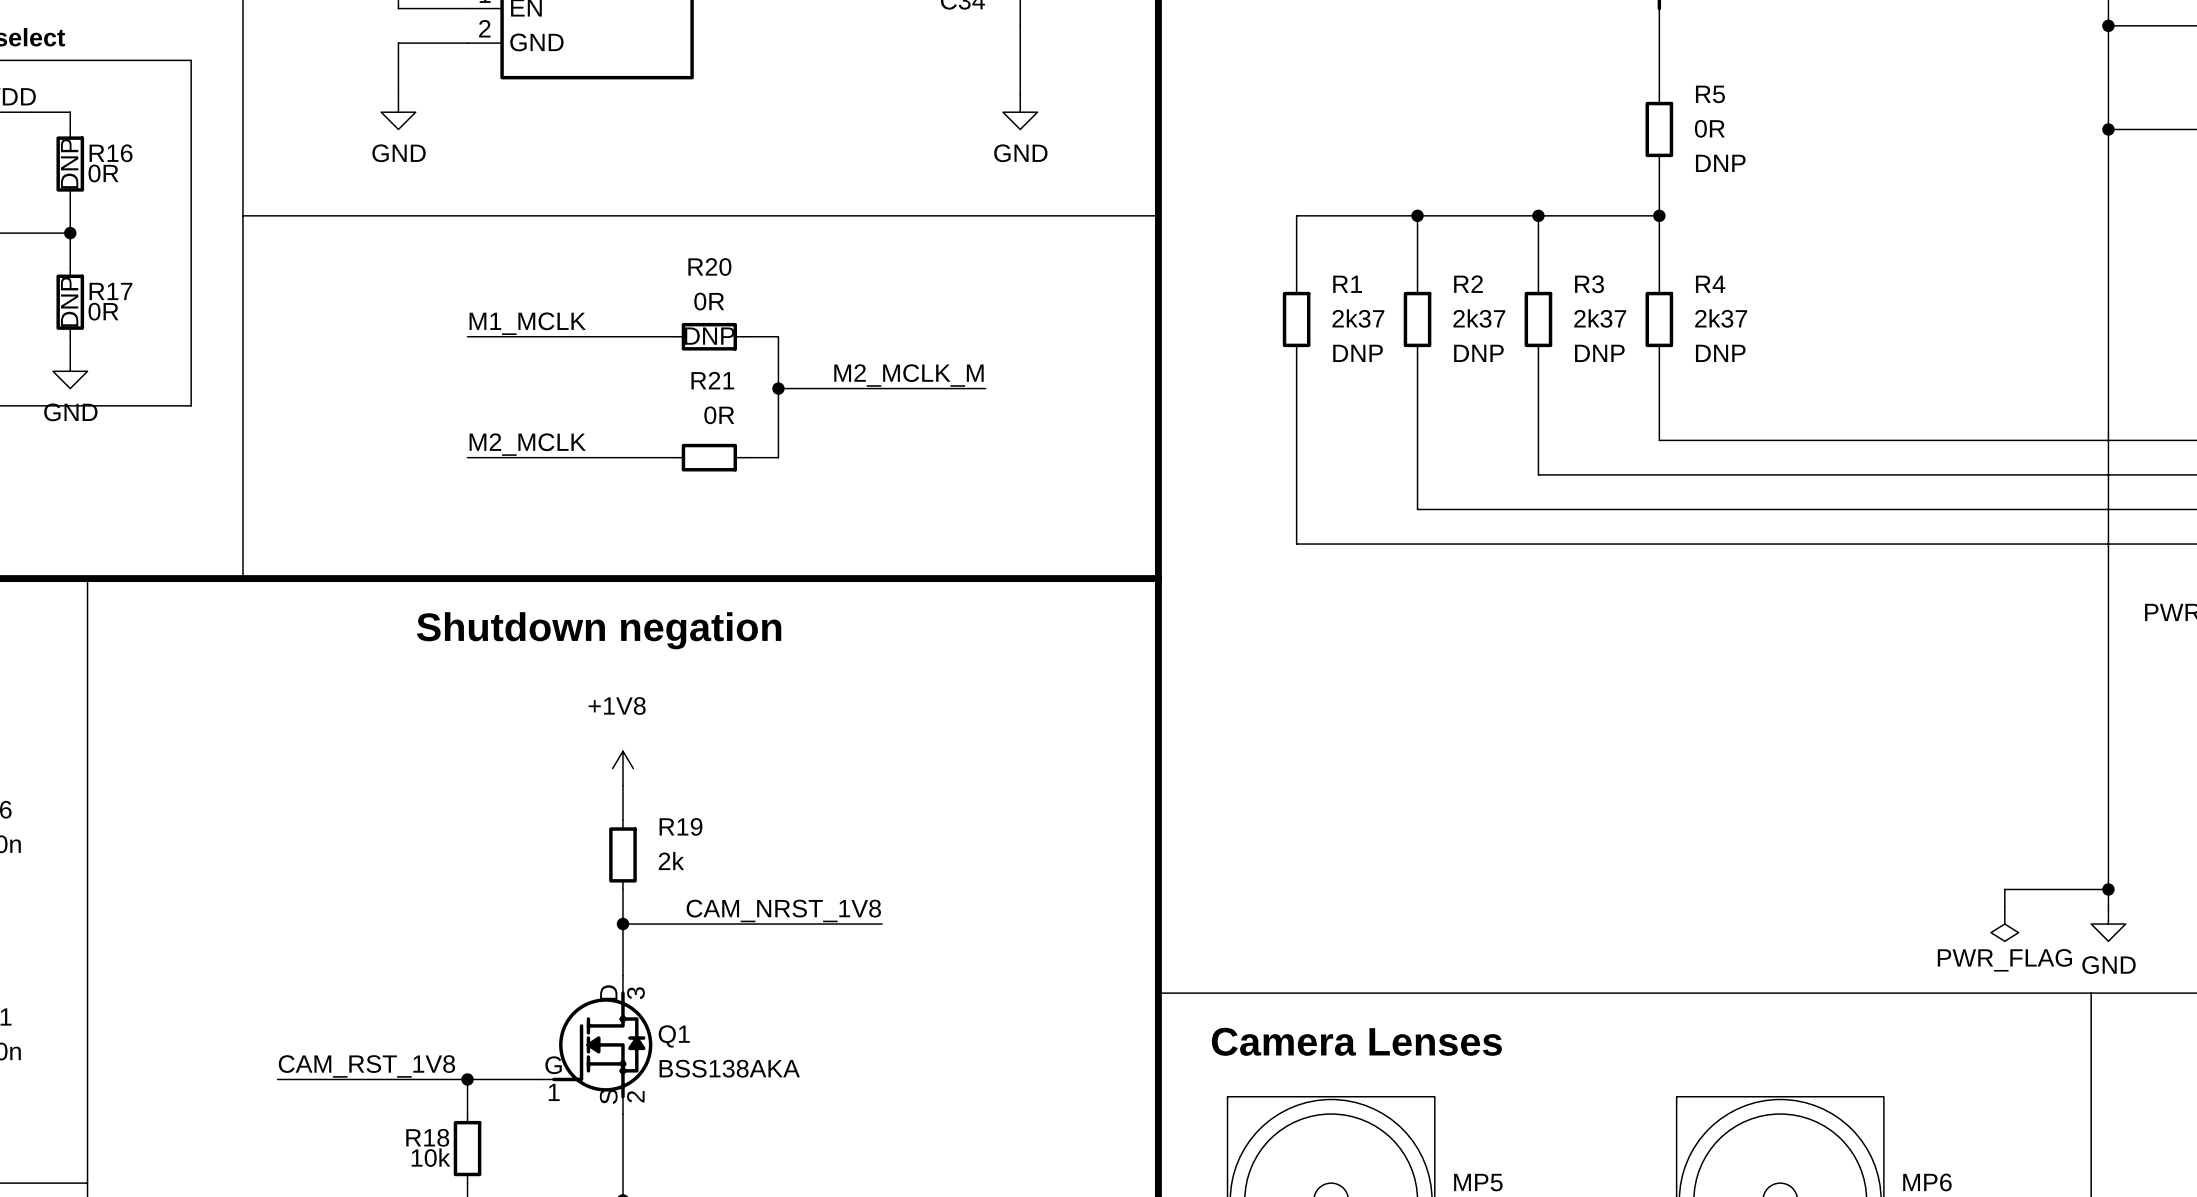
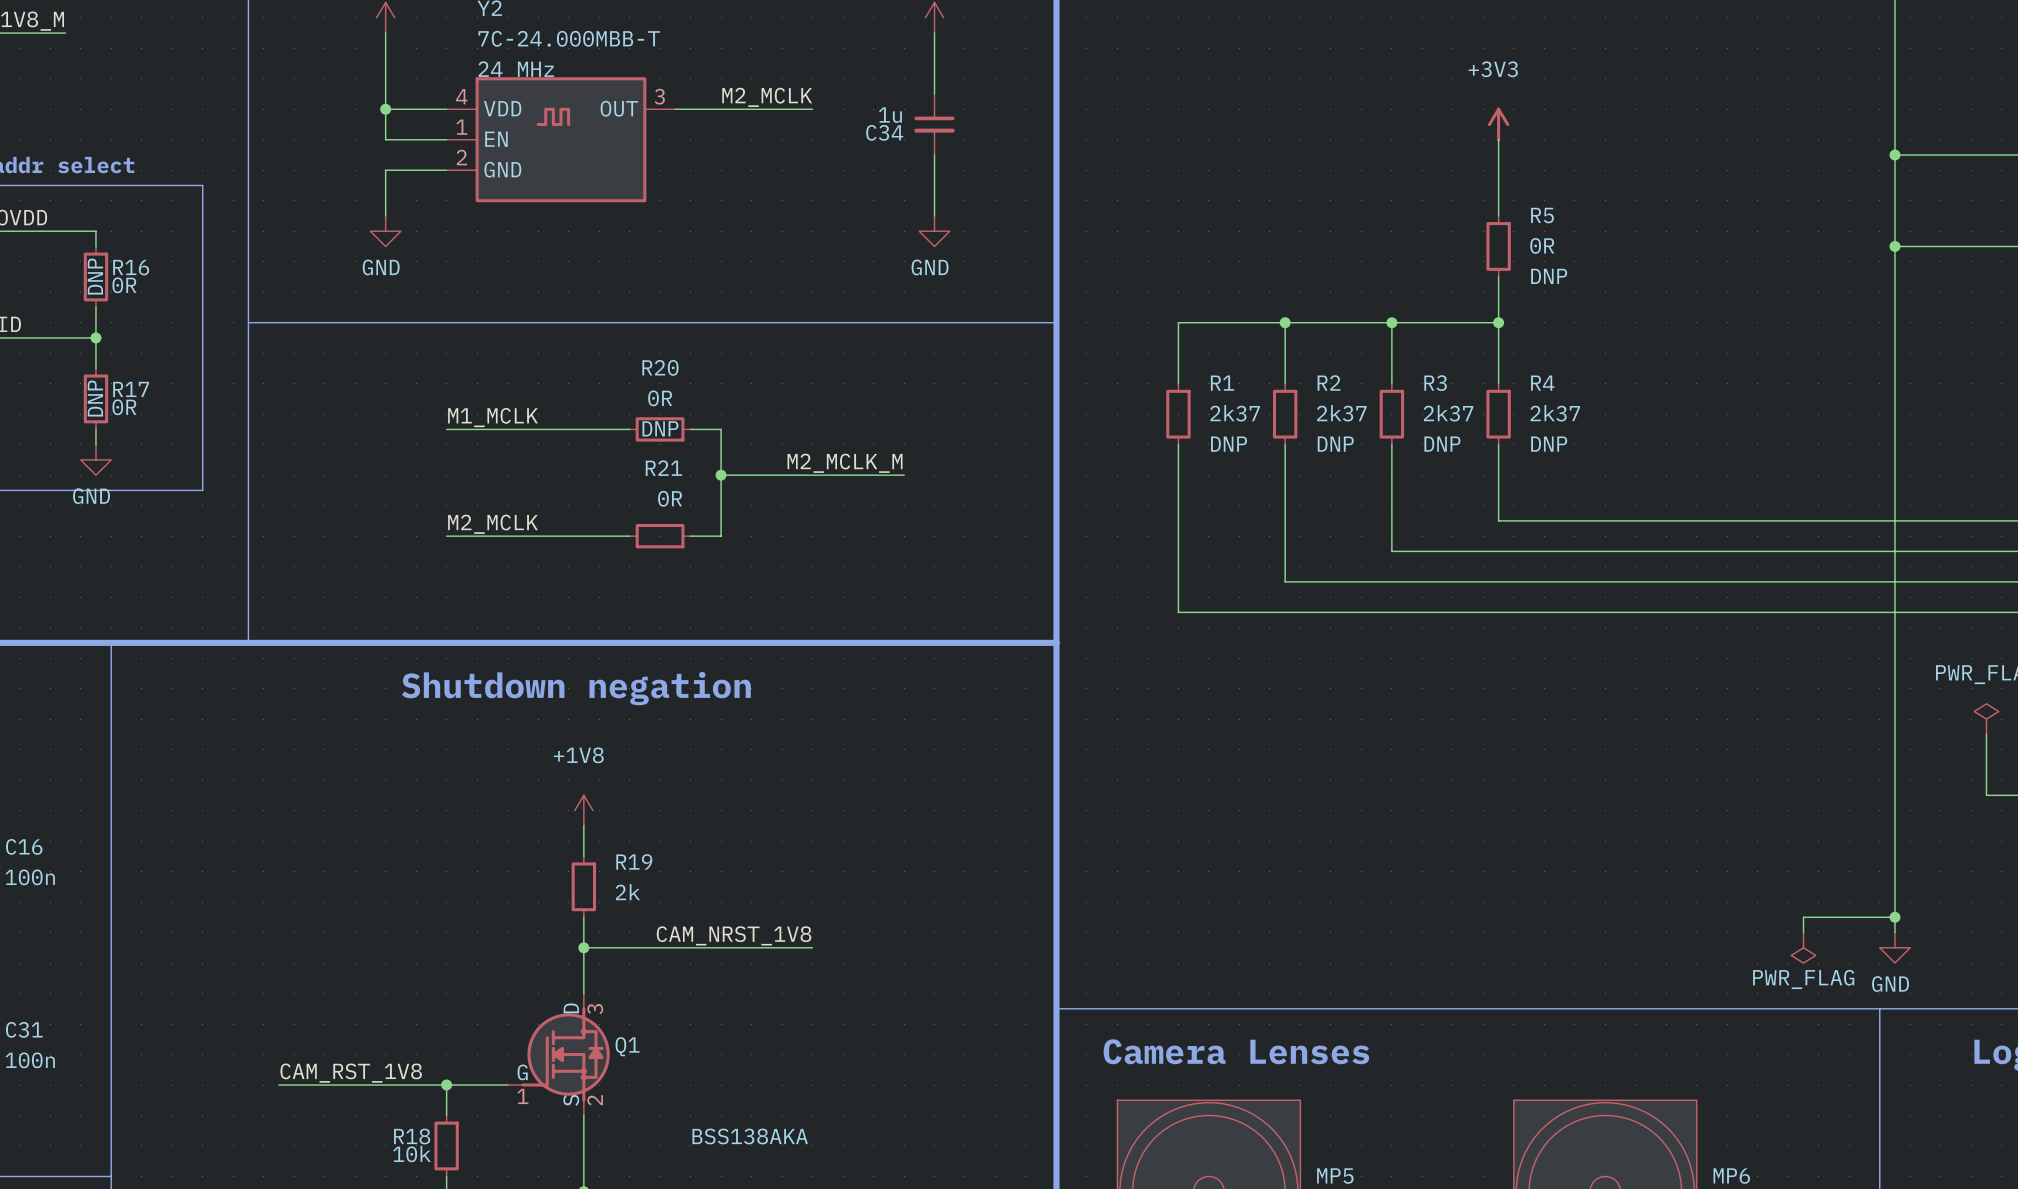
Q1 text position: BSS138AKA (729, 1068) -> BSS138AKA (750, 1136)

